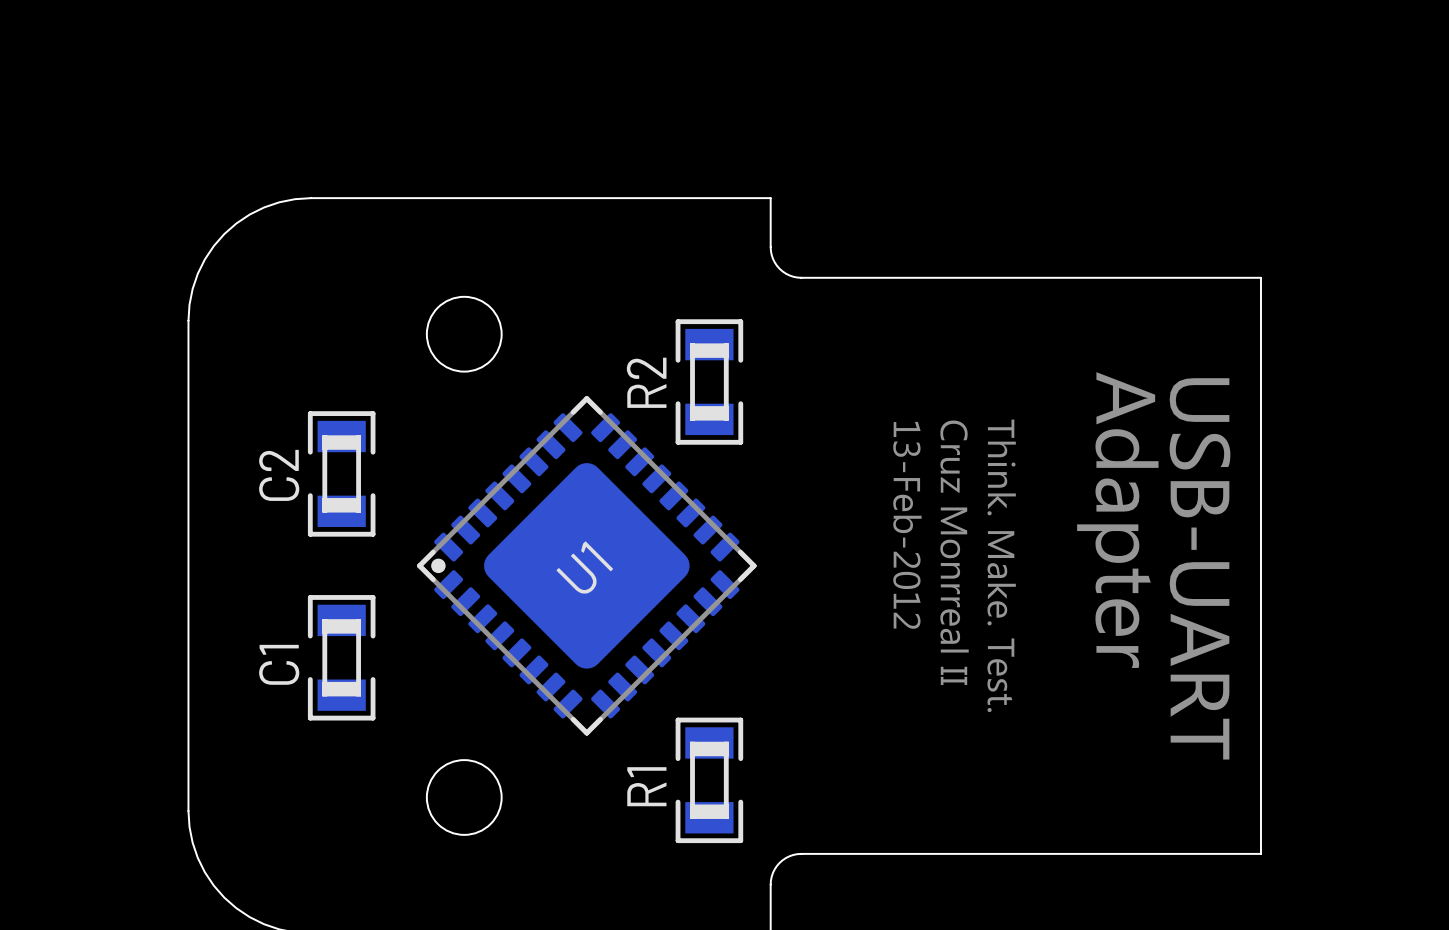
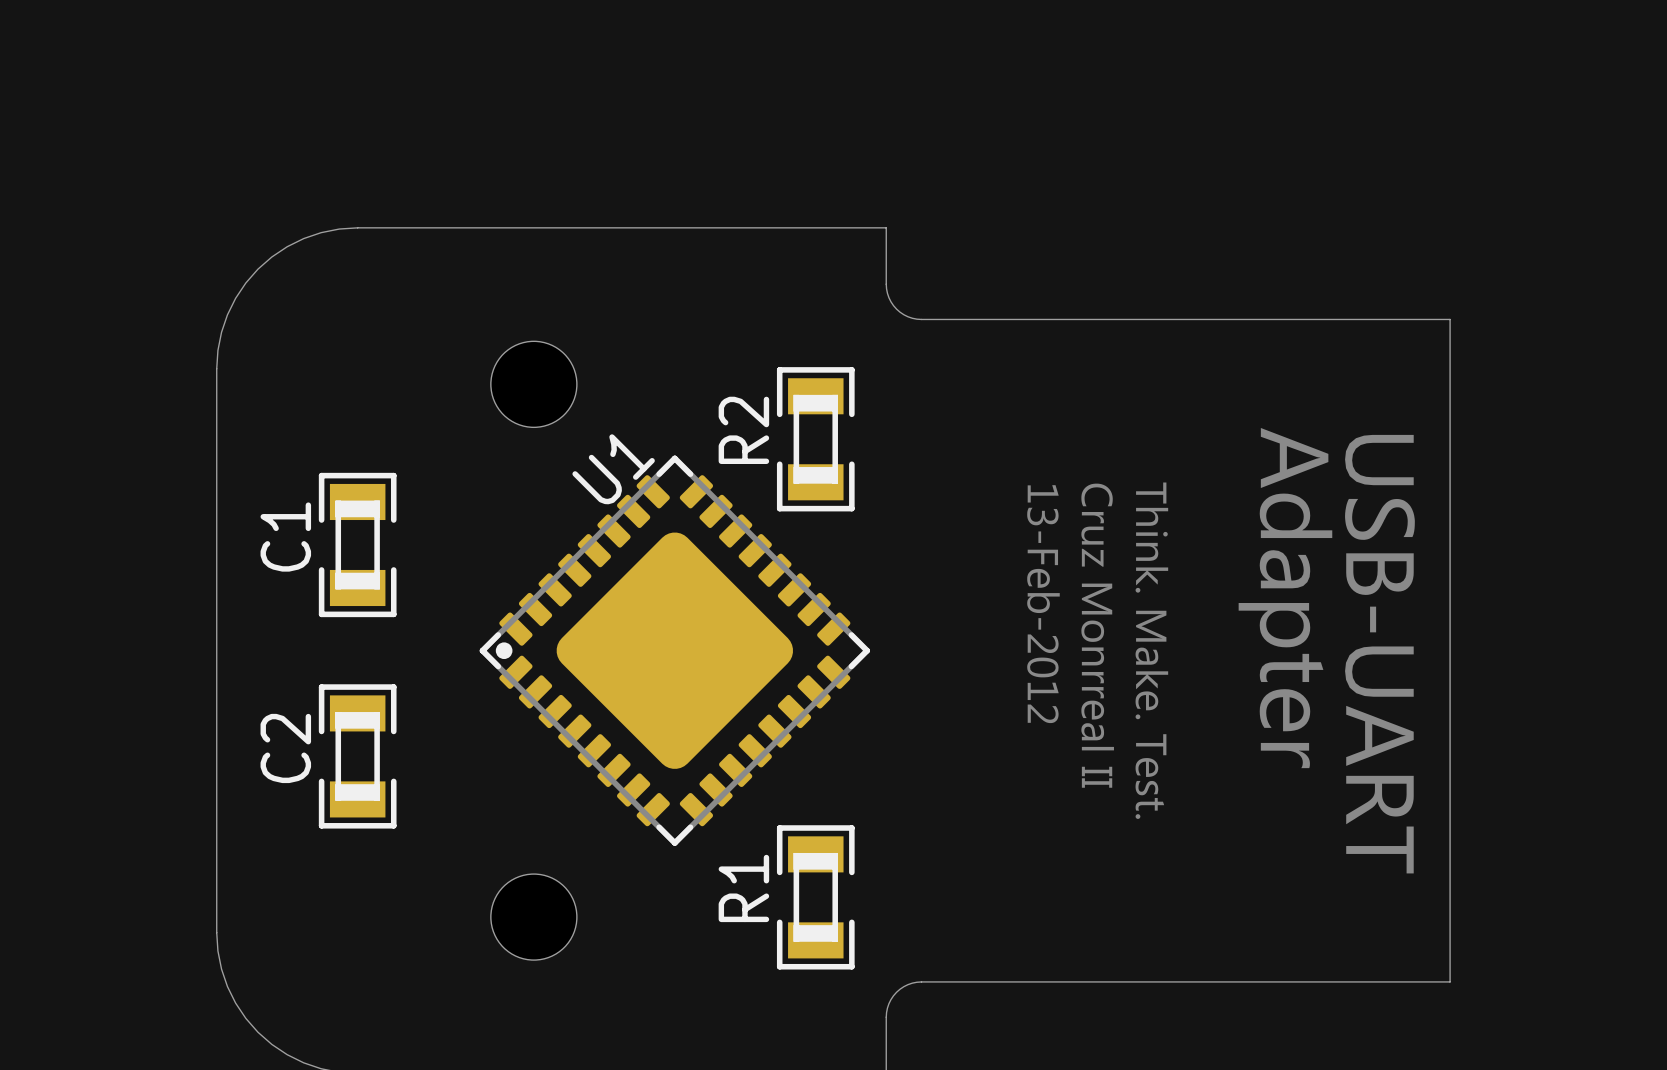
C2 position: (341, 473) -> (357, 756)
U1 name position: U1 (584, 567) -> U1 (613, 469)
C1 position: (341, 657) -> (357, 544)

